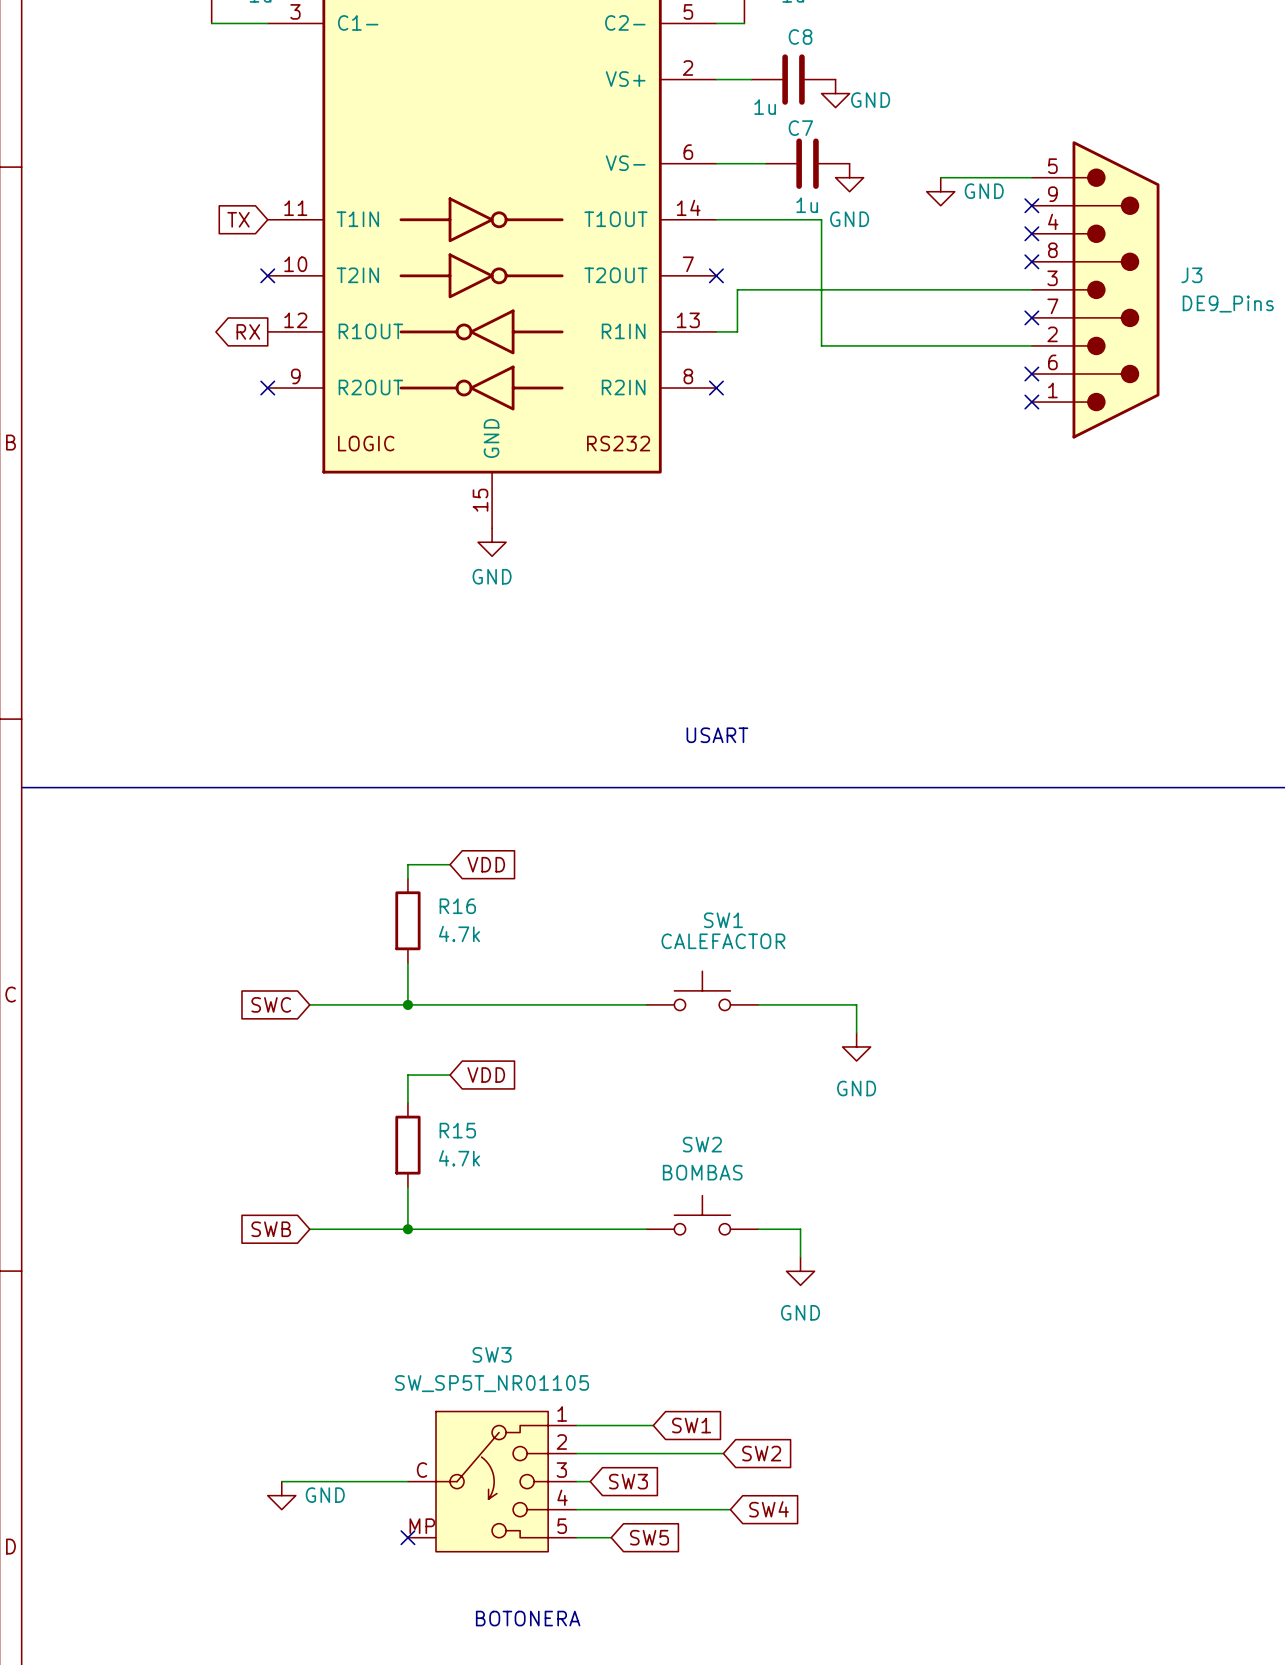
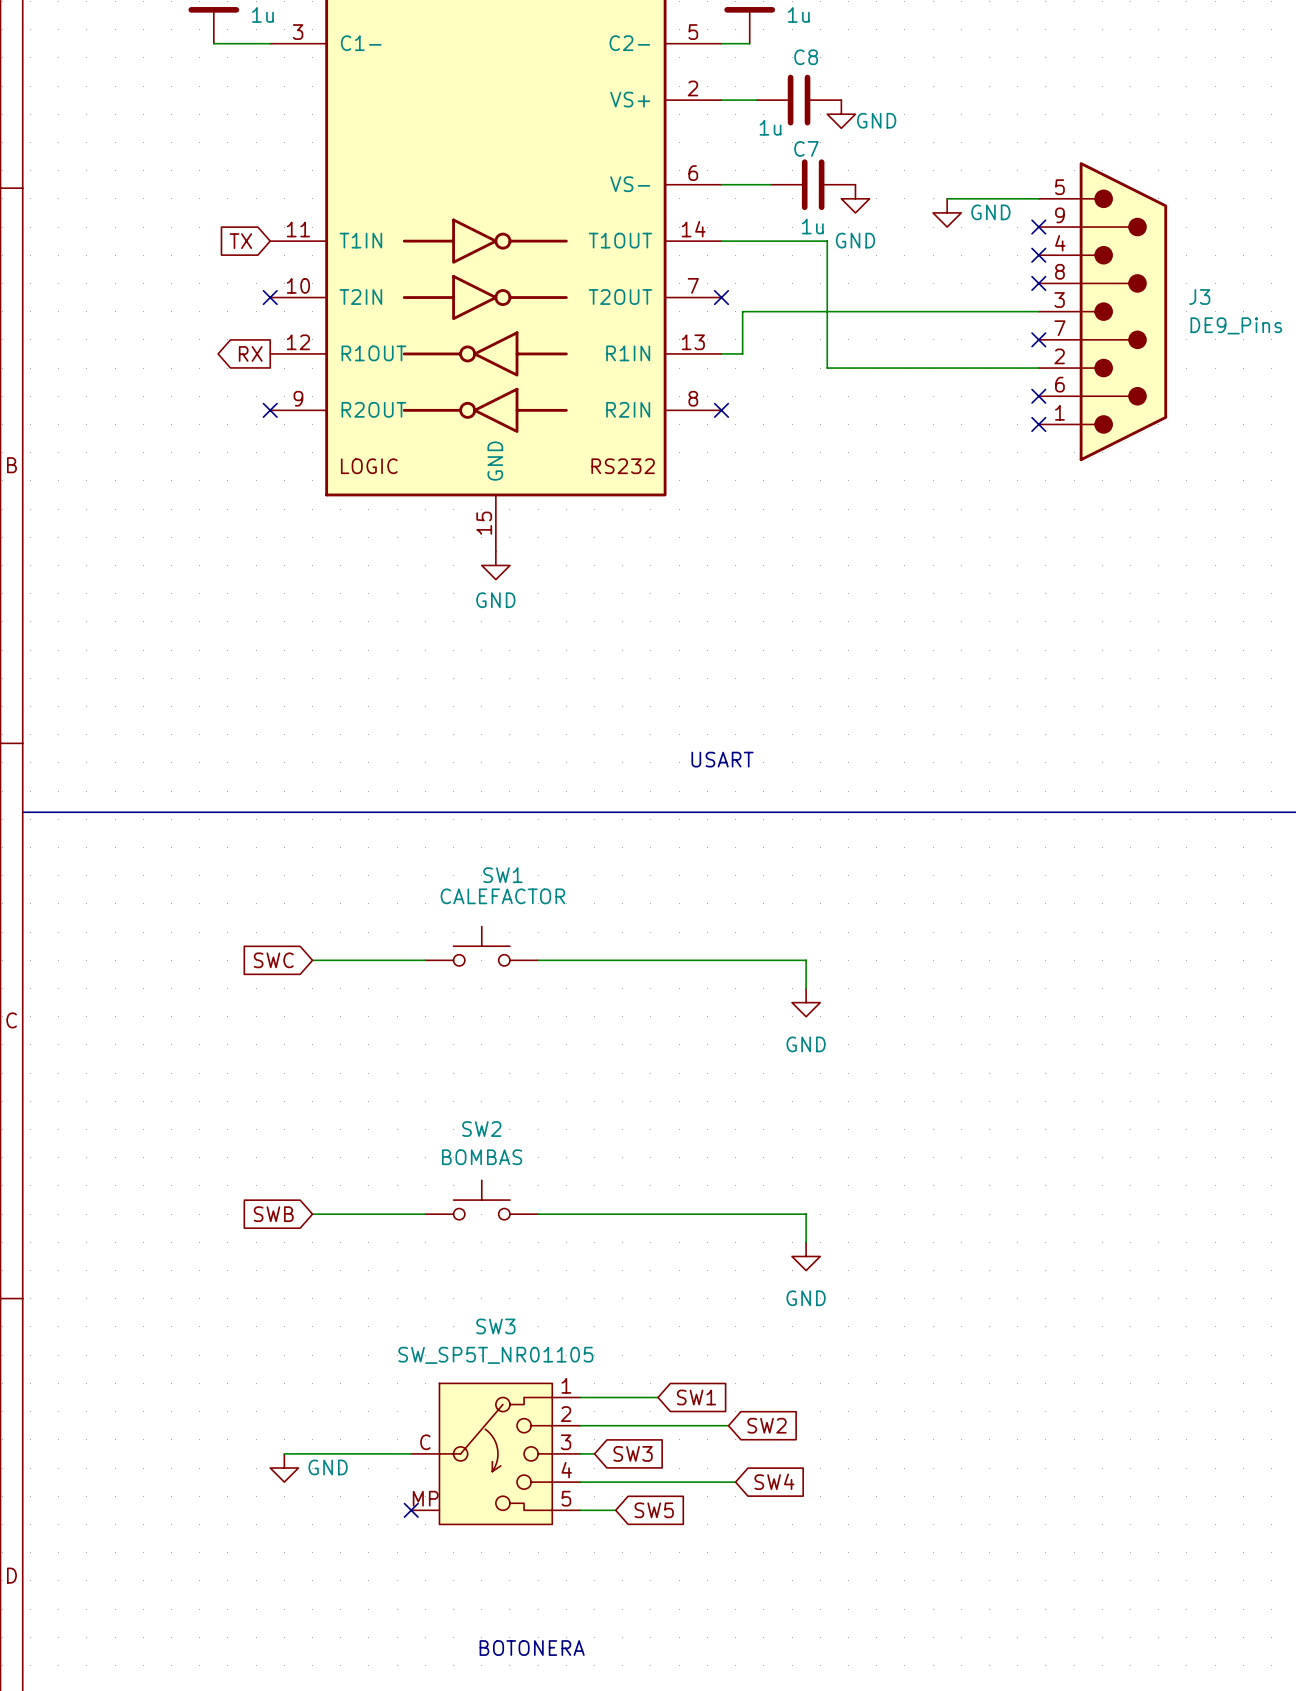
wire: (450, 864) (407, 864) (407, 878) -> none
global label: VDD (486, 864) -> none
R16: 4.7k (407, 920) -> none
wire: none -> (312, 960) (425, 960)
wire: none -> (538, 960) (806, 960) (806, 988)
wire: (407, 962) (407, 1004) -> none
SW1 position: (702, 990) -> (481, 946)
global label position: SWC (271, 1004) -> SWC (273, 960)
wire: (309, 1004) (646, 1004) -> none
junction: (407, 1004) -> none
wire: (758, 1004) (856, 1004) (856, 1032) -> none
power symbol position: GND (856, 1046) -> GND (806, 1002)
wire: (450, 1075) (407, 1075) (407, 1103) -> none
global label: VDD (486, 1075) -> none
R15: 4.7k (407, 1145) -> none
wire: none -> (312, 1214) (425, 1214)
wire: (407, 1187) (407, 1229) -> none
wire: none -> (538, 1214) (806, 1214) (806, 1242)
SW2 position: (702, 1215) -> (481, 1200)
global label position: SWB (271, 1229) -> SWB (273, 1214)
wire: (309, 1229) (646, 1229) -> none
junction: (407, 1229) -> none
wire: (758, 1229) (800, 1229) (800, 1257) -> none
power symbol position: GND (800, 1271) -> GND (806, 1256)
wire: none -> (580, 1397) (658, 1397)
wire: none -> (580, 1425) (728, 1425)
wire: (590, 1425) (653, 1425) -> none
global label position: SW1 (691, 1425) -> SW1 (696, 1397)
wire: none -> (728, 1482) (735, 1482)
global label position: SW2 (761, 1453) -> SW2 (767, 1425)
wire: (281, 1481) (407, 1481) -> (284, 1453) (411, 1453)
SW3 position: (492, 1481) -> (495, 1453)
wire: none -> (594, 1510) (615, 1510)
global label position: SW3 (628, 1481) -> SW3 (633, 1453)
power symbol position: GND (281, 1495) -> GND (284, 1468)
wire: (576, 1509) (730, 1509) -> none
global label position: SW4 (769, 1509) -> SW4 (774, 1481)
no-connect mark position: (407, 1537) -> (411, 1510)
wire: (576, 1537) (611, 1537) -> none
global label position: SW5 (649, 1537) -> SW5 (654, 1510)

